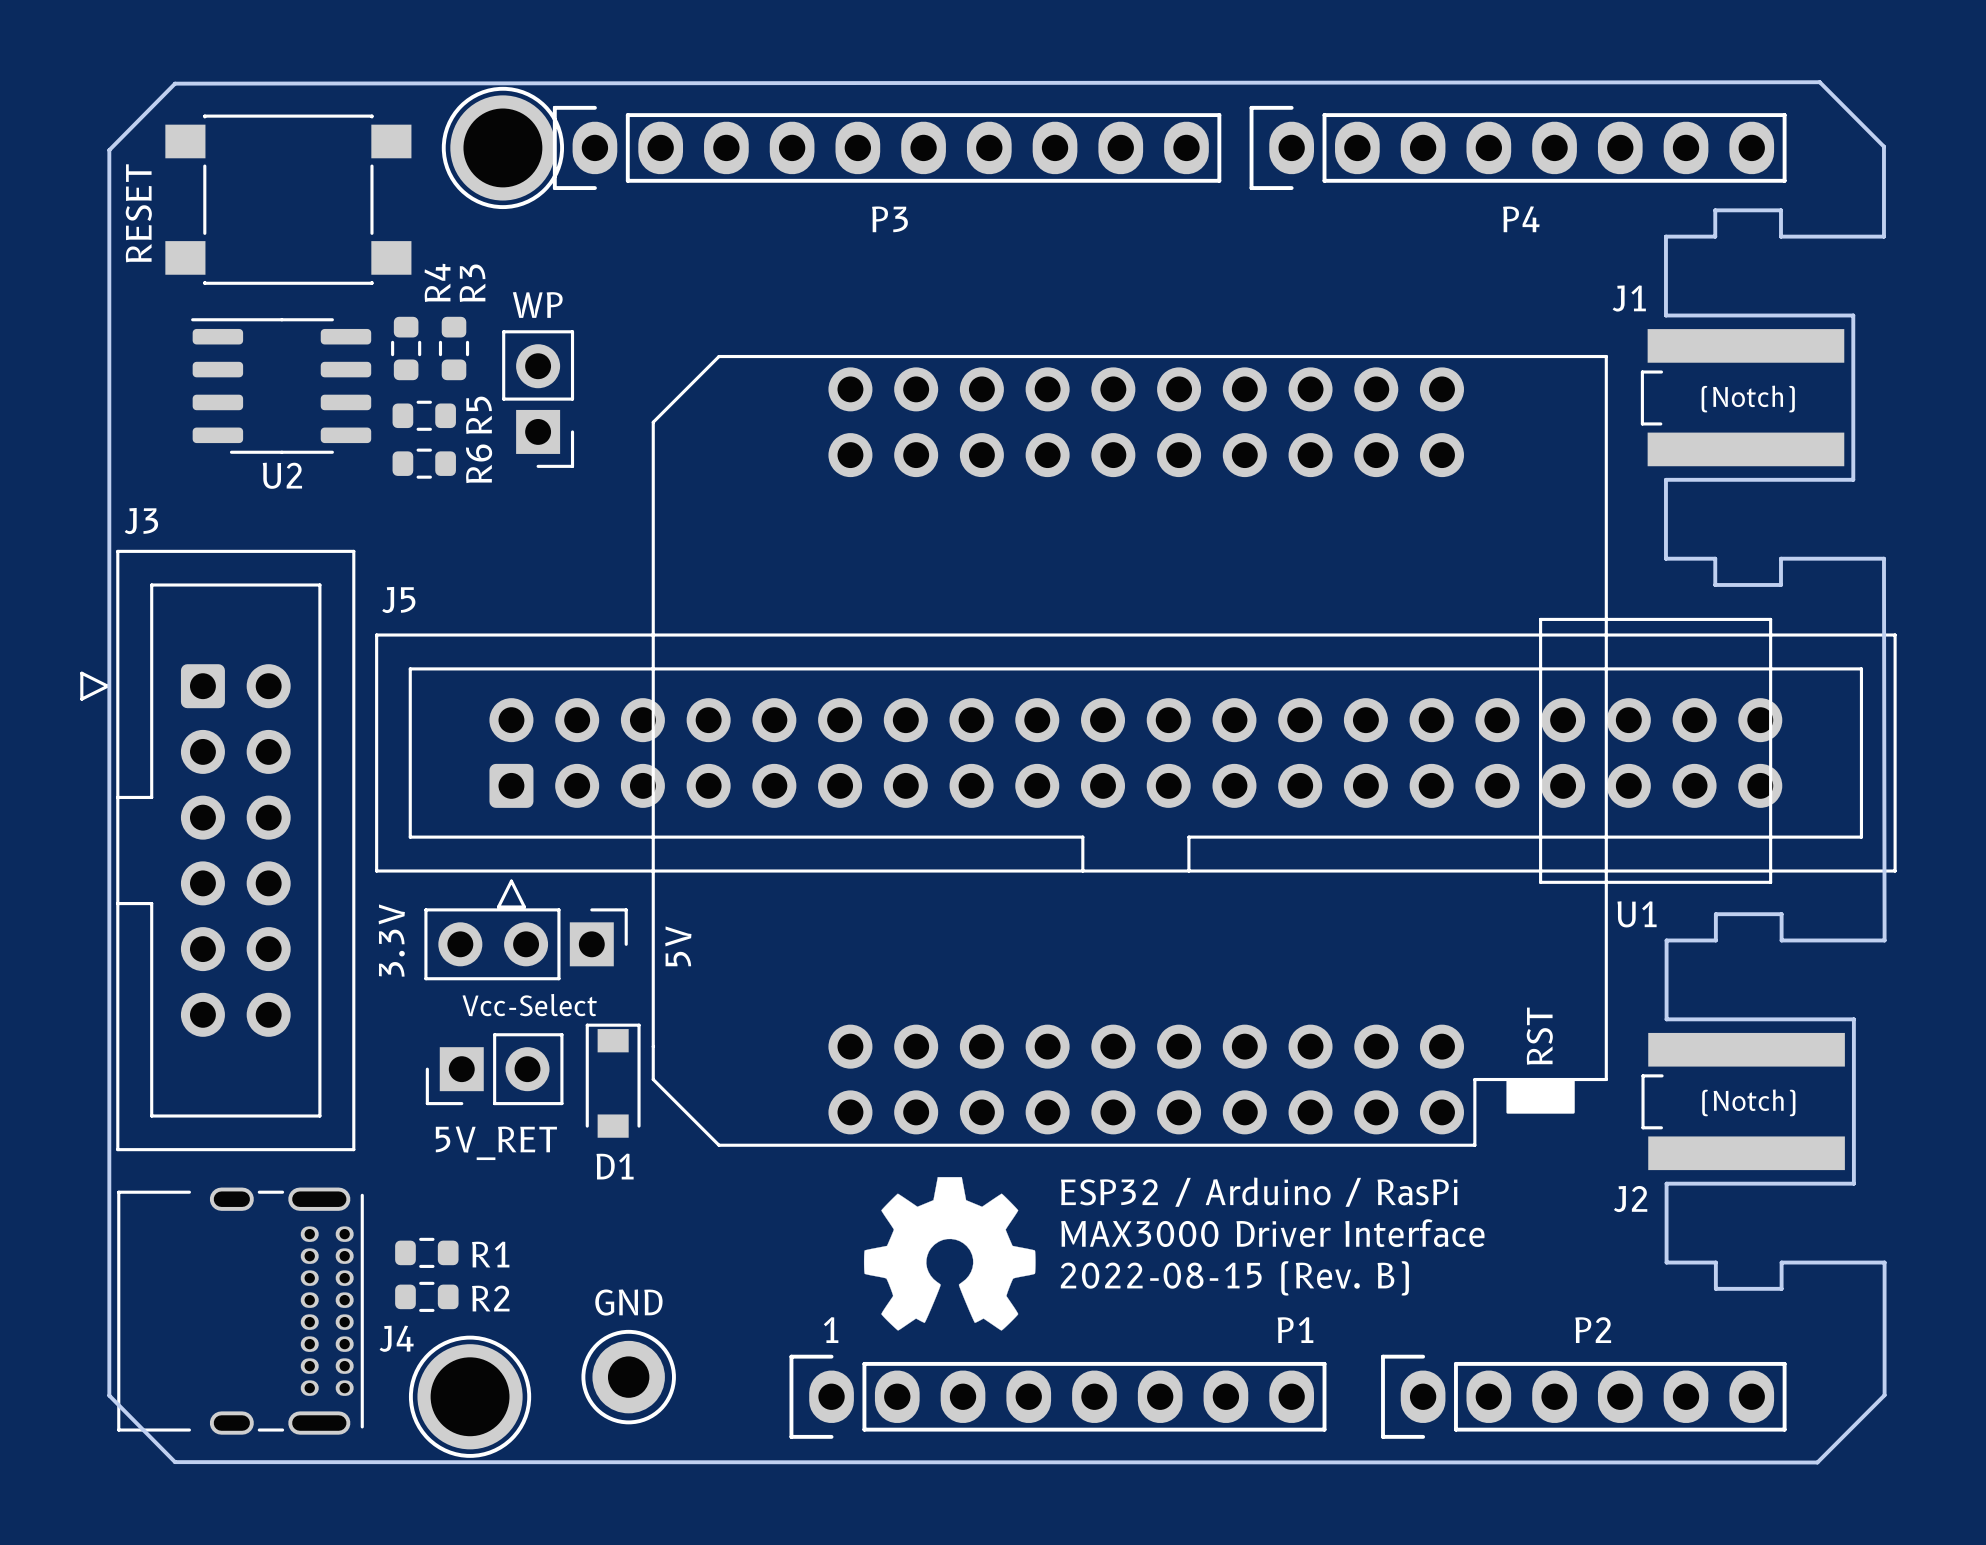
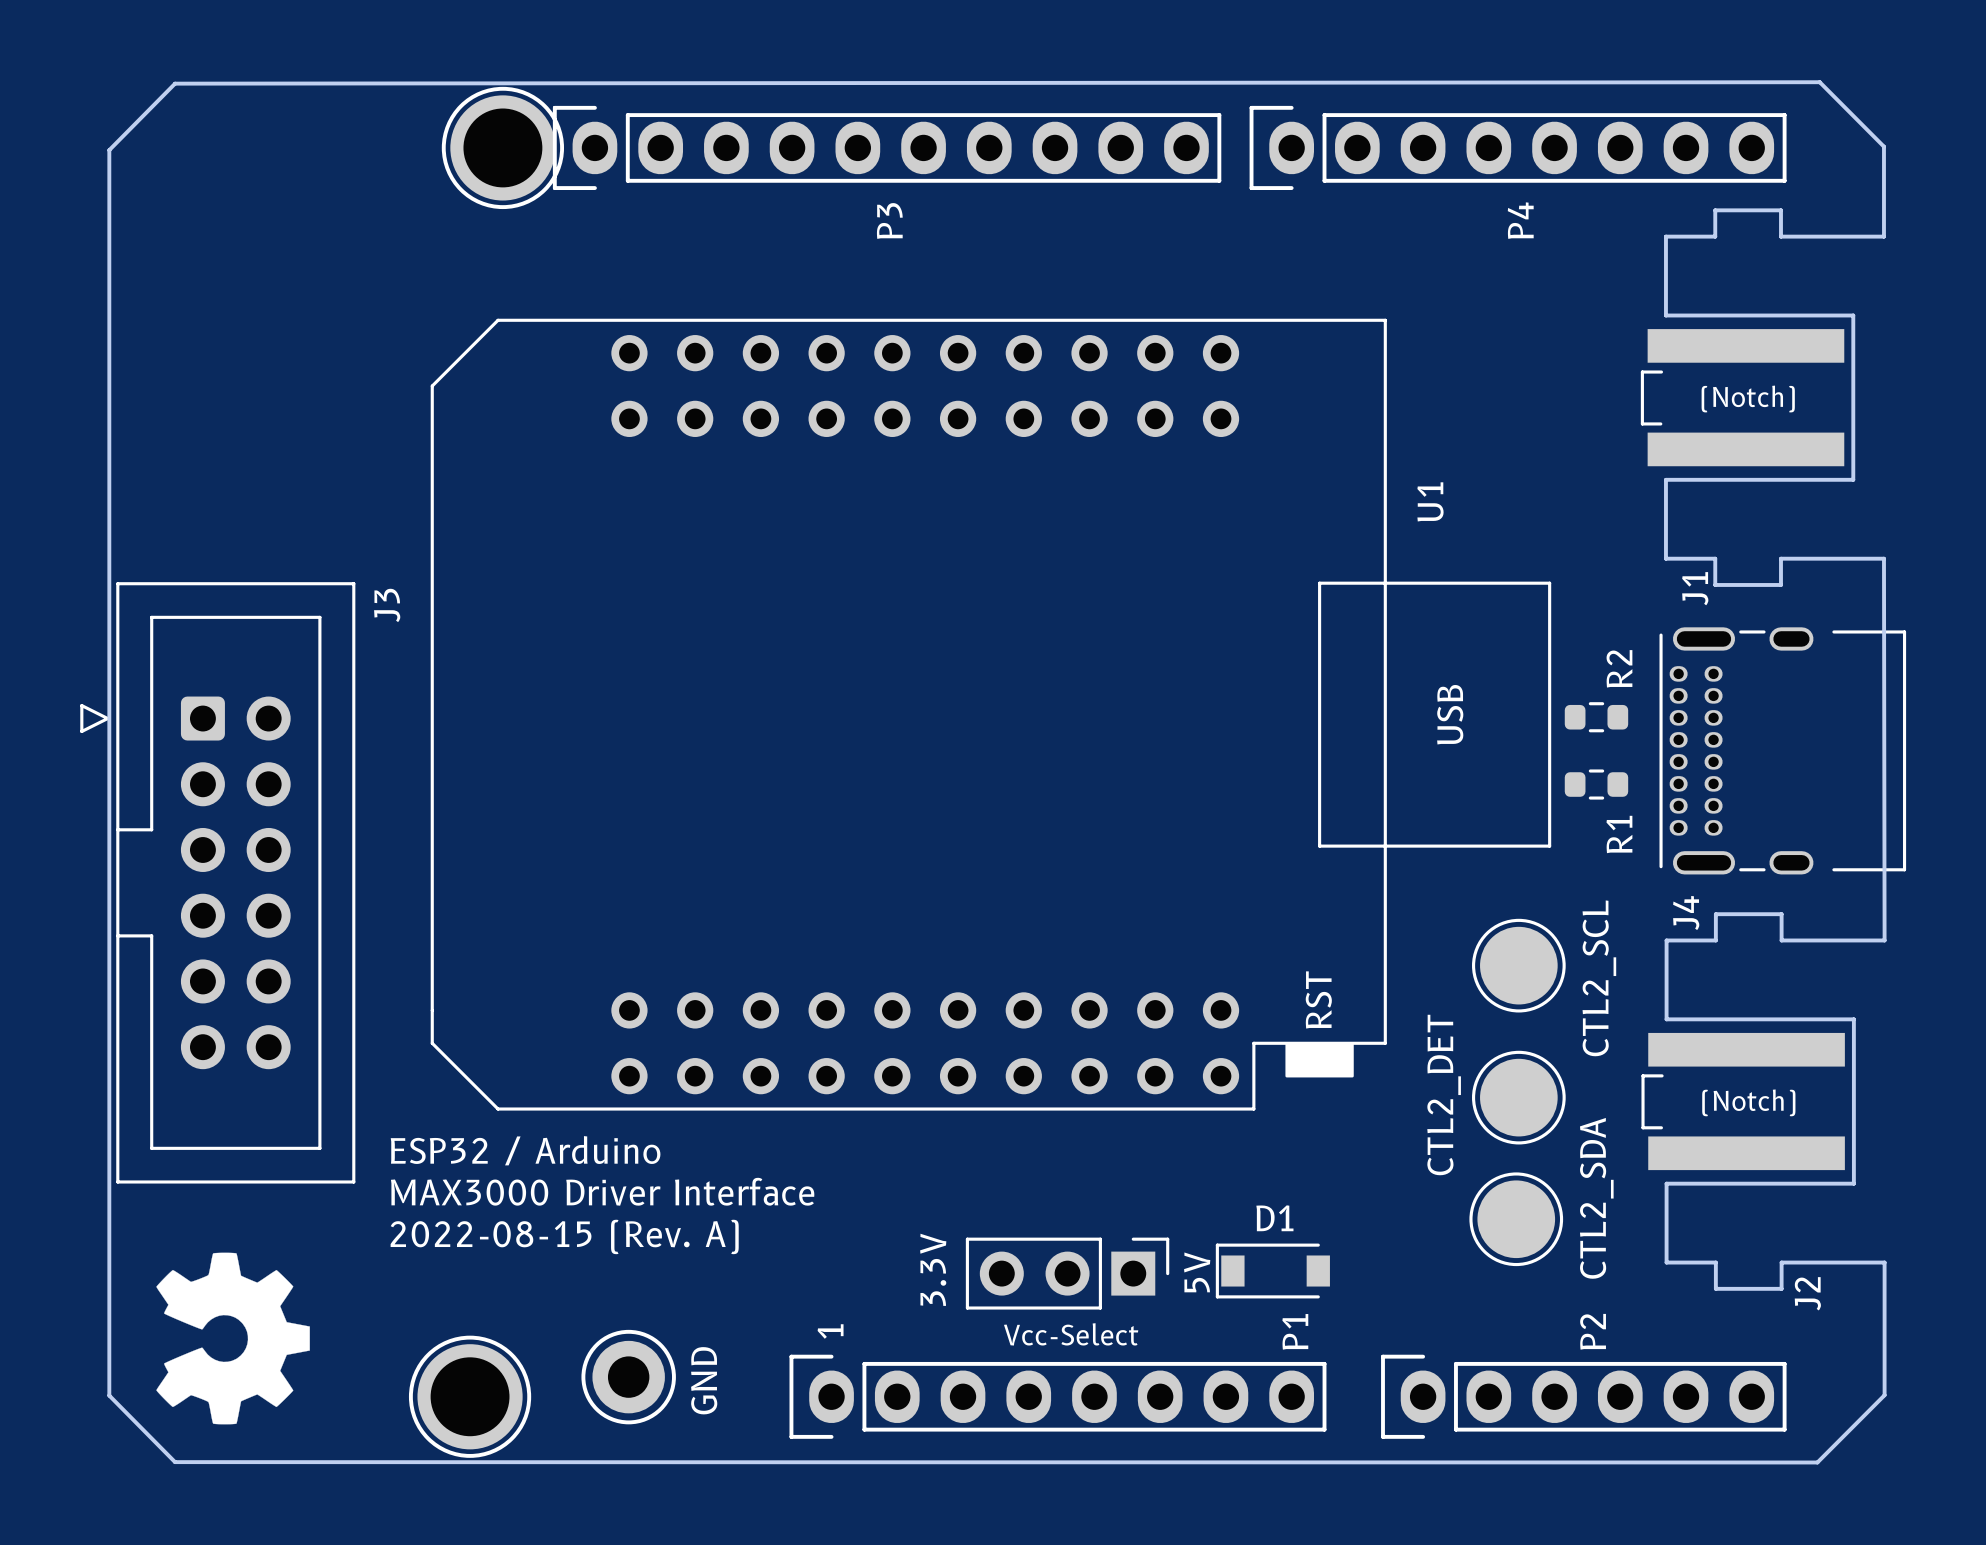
part: RESET (288, 199) -> none
P3 name rotation: 0° (889, 219) -> 90° counterclockwise (889, 220)
P4 name rotation: 0° (1521, 219) -> 90° counterclockwise (1520, 220)
J1 name rotation: 0° (1629, 298) -> 90° counterclockwise (1695, 588)
J1 name position: J1 (1629, 298) -> J1 (1695, 588)
R4: (406, 348) -> none
R3: (454, 348) -> none
U1 footprint: [651, 354, 1773, 1147] -> [430, 318, 1552, 1111]
U2: (281, 386) -> none
part: WP (538, 399) -> none
R5: (424, 415) -> none
R6: (424, 463) -> none
J3 name rotation: 0° (141, 521) -> 90° counterclockwise (387, 605)
J3 name position: J3 (141, 521) -> J3 (387, 605)
J5: (1135, 771) -> none
J3 position: (217, 850) -> (217, 882)
U1 name position: U1 (1637, 914) -> U1 (1430, 501)
part: Vcc-Select (526, 944) -> none
part: none -> CTL2_SCL (1518, 965)
part: 5V_RET (494, 1069) -> none
D1 rotation: 0° (613, 1080) -> 90° counterclockwise (1272, 1271)
D1 position: (613, 1080) -> (1272, 1271)
part: none -> CTL2_DET (1518, 1097)
text: none -> ESP32 / Arduino (525, 1150)
D1 name position: D1 (615, 1166) -> D1 (1274, 1218)
drawing: [863, 1177, 1036, 1331] -> none
text: none -> MAX3000 Driver Interface (602, 1191)
text: ESP32 / Arduino / RasPi (1259, 1192) -> none
J2 name rotation: 0° (1630, 1199) -> 90° counterclockwise (1807, 1293)
J2 name position: J2 (1630, 1199) -> J2 (1807, 1293)
part: none -> CTL2_SDA (1516, 1219)
text: MAX3000 Driver Interface (1272, 1233) -> none
text: none -> 2022-08-15 (Rev. A) (564, 1236)
drawing: none -> [156, 1252, 310, 1425]
R1 position: (426, 1252) -> (1596, 784)
R1 name rotation: 0° (490, 1254) -> 90° counterclockwise (1619, 834)
part: none -> Vcc-Select (1067, 1273)
text: 2022-08-15 (Rev. B) (1234, 1278) -> none
R2 position: (426, 1296) -> (1596, 717)
R2 name rotation: 0° (490, 1298) -> 90° counterclockwise (1619, 668)
R2 name position: R2 (490, 1298) -> R2 (1619, 668)
part value rotation: 0° (628, 1302) -> 90° counterclockwise (704, 1380)
part value position: GND (628, 1302) -> GND (704, 1380)
J4 rotation: 0° (240, 1311) -> 180° (1782, 750)
J4 position: (240, 1311) -> (1782, 750)
text rotation: 0° (831, 1330) -> 90° counterclockwise (830, 1331)
P1 name rotation: 0° (1295, 1330) -> 90° counterclockwise (1295, 1331)
P2 name rotation: 0° (1593, 1330) -> 90° counterclockwise (1593, 1331)
J4 name position: J4 (396, 1338) -> J4 (1686, 913)

